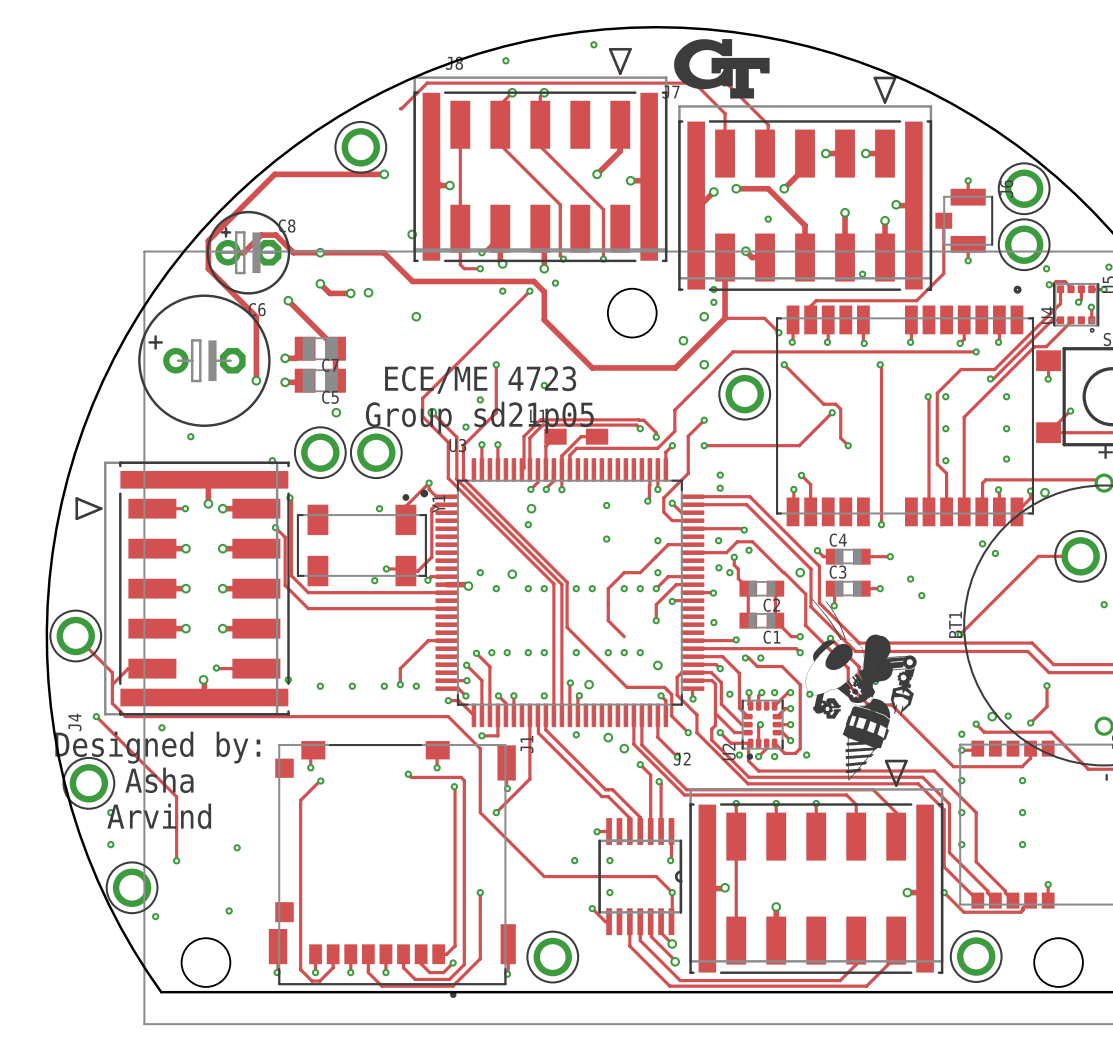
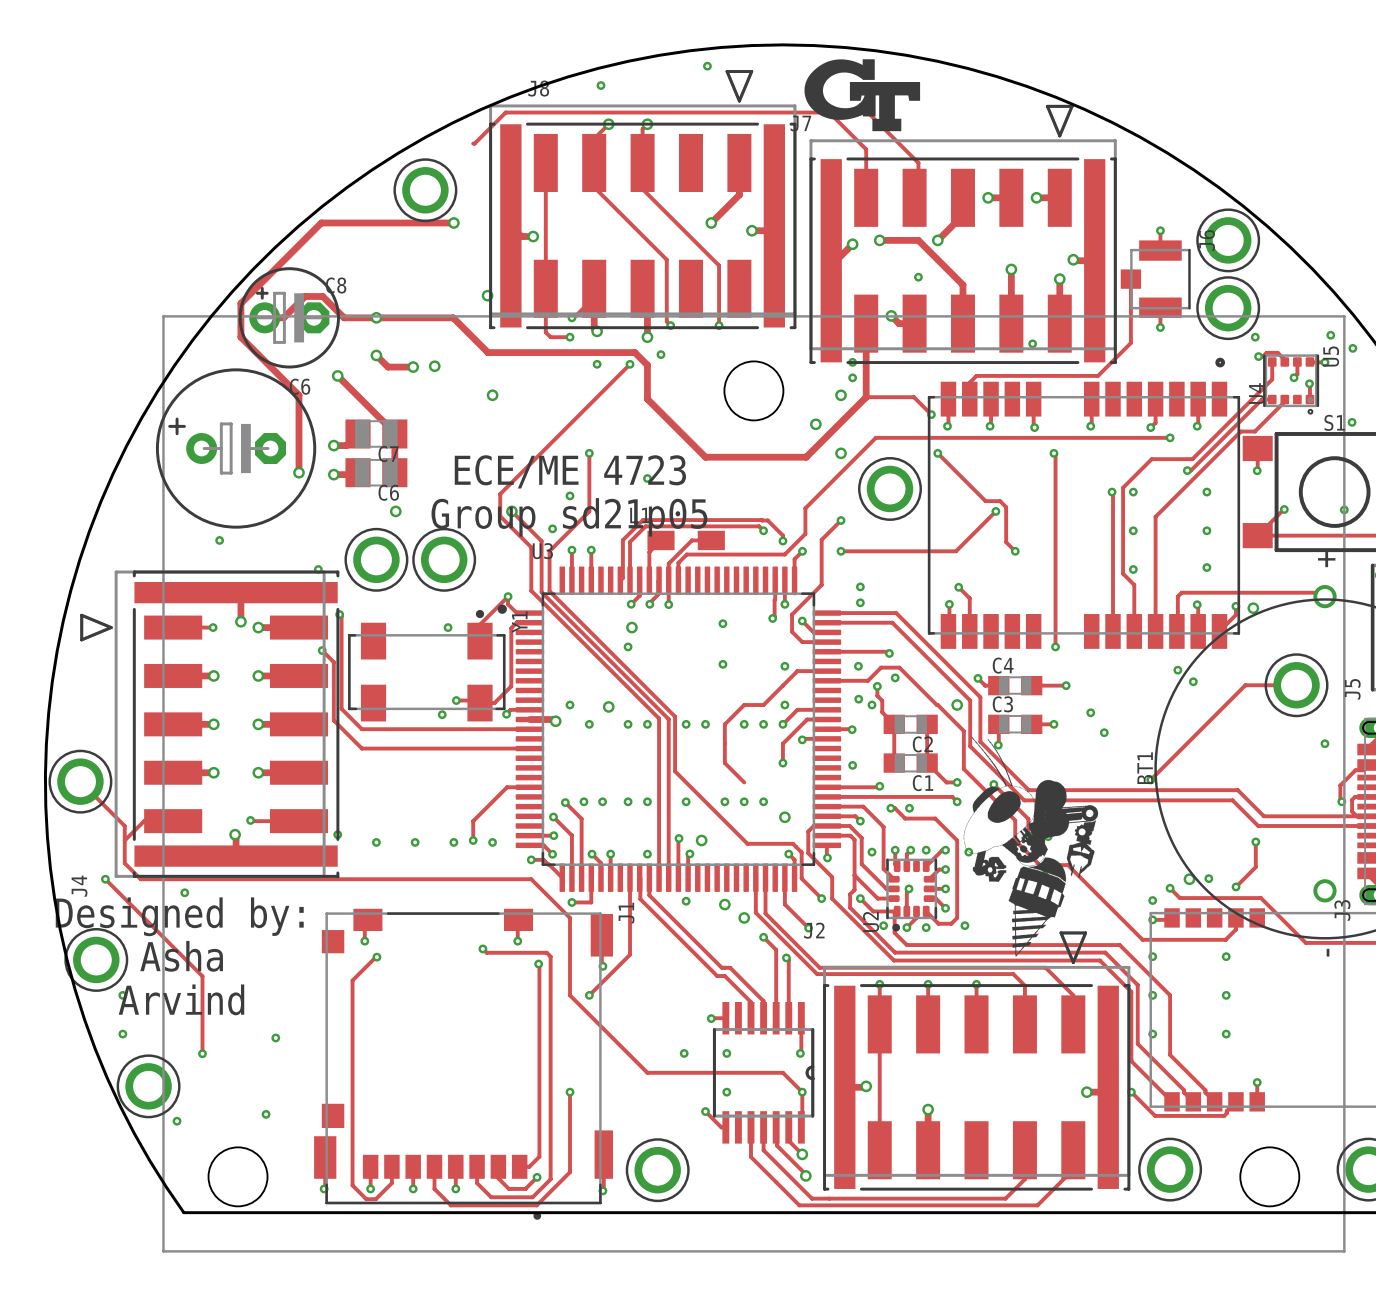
C5 name: C5 (330, 397) -> C6 (388, 492)

